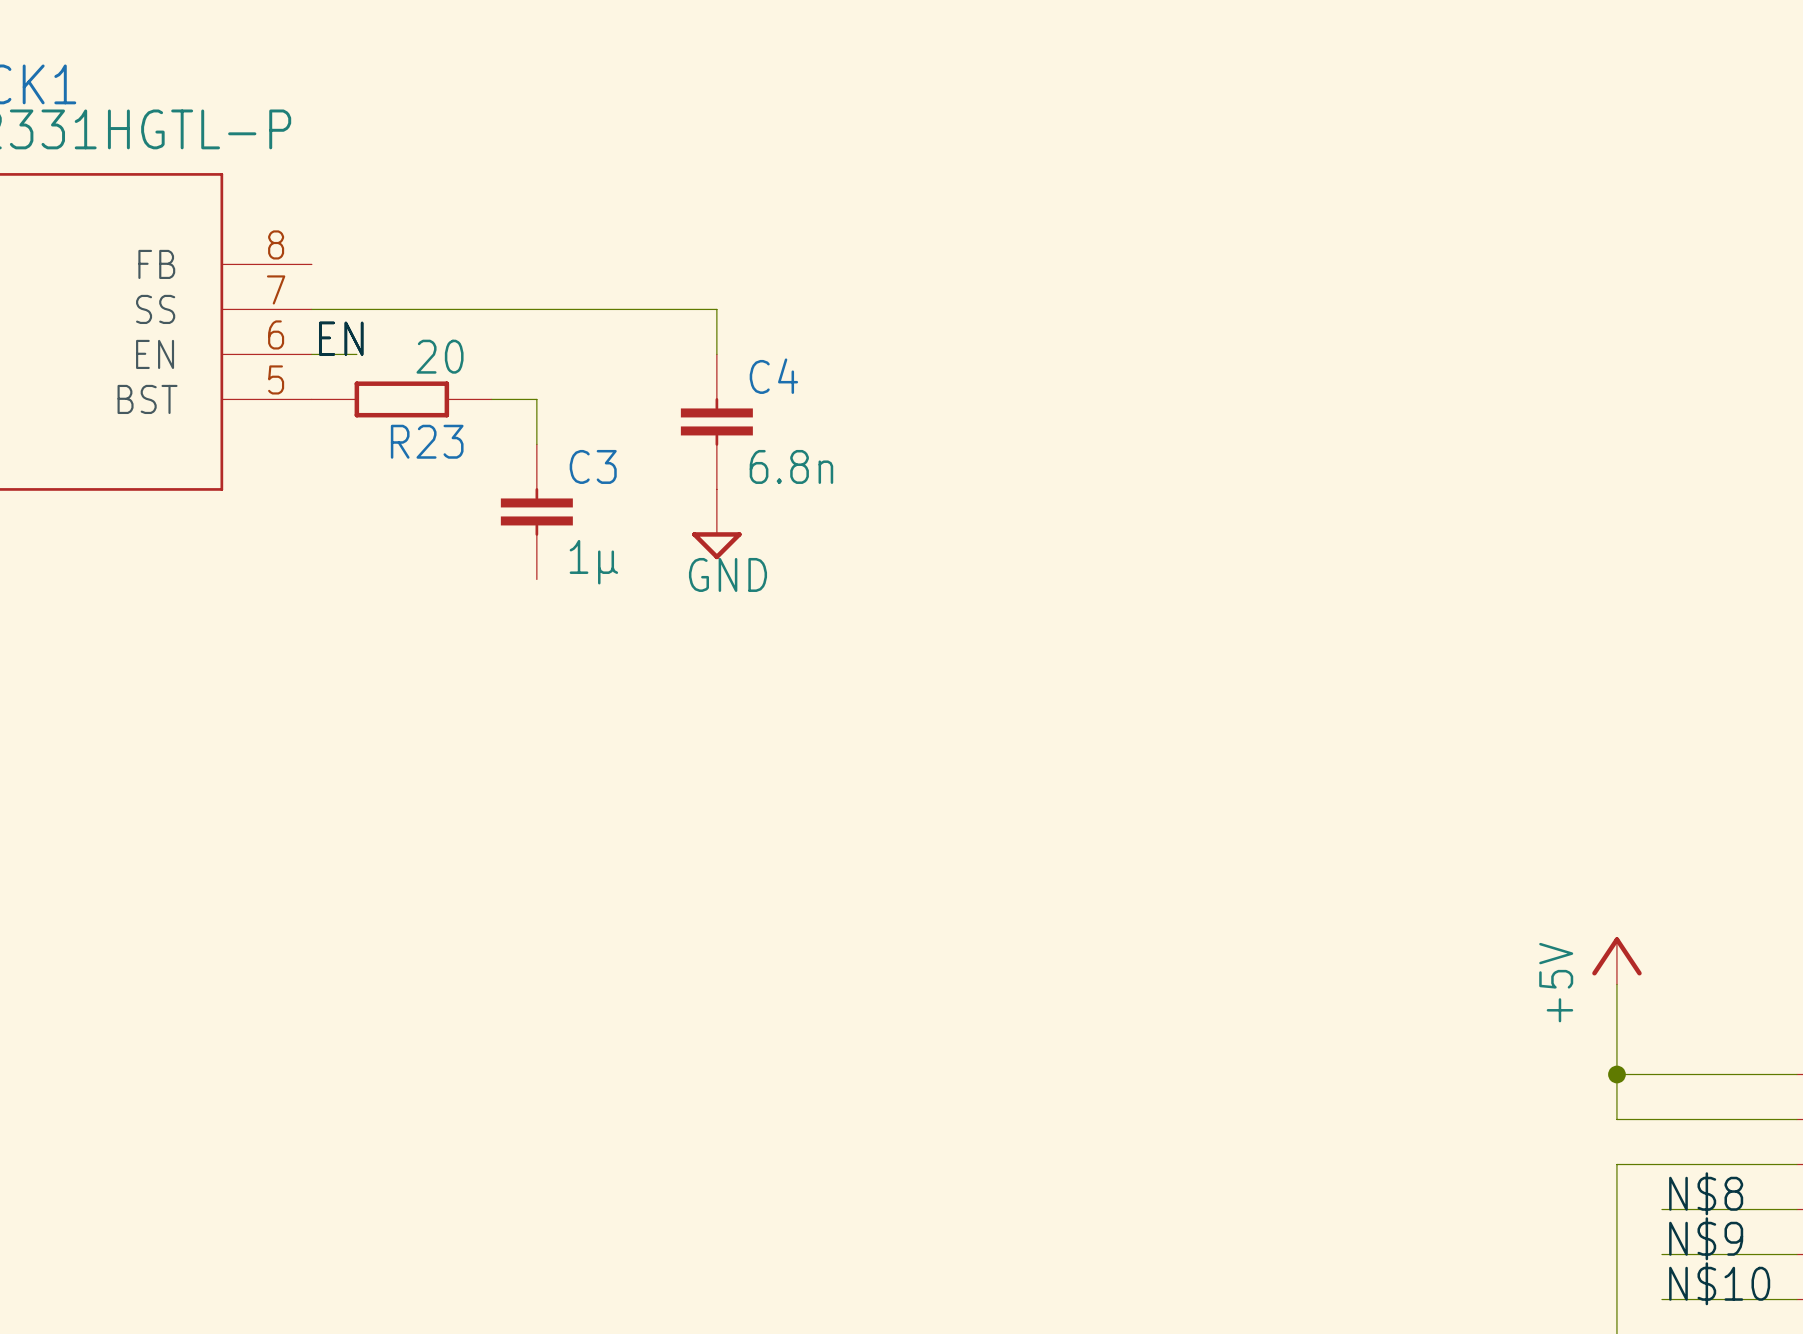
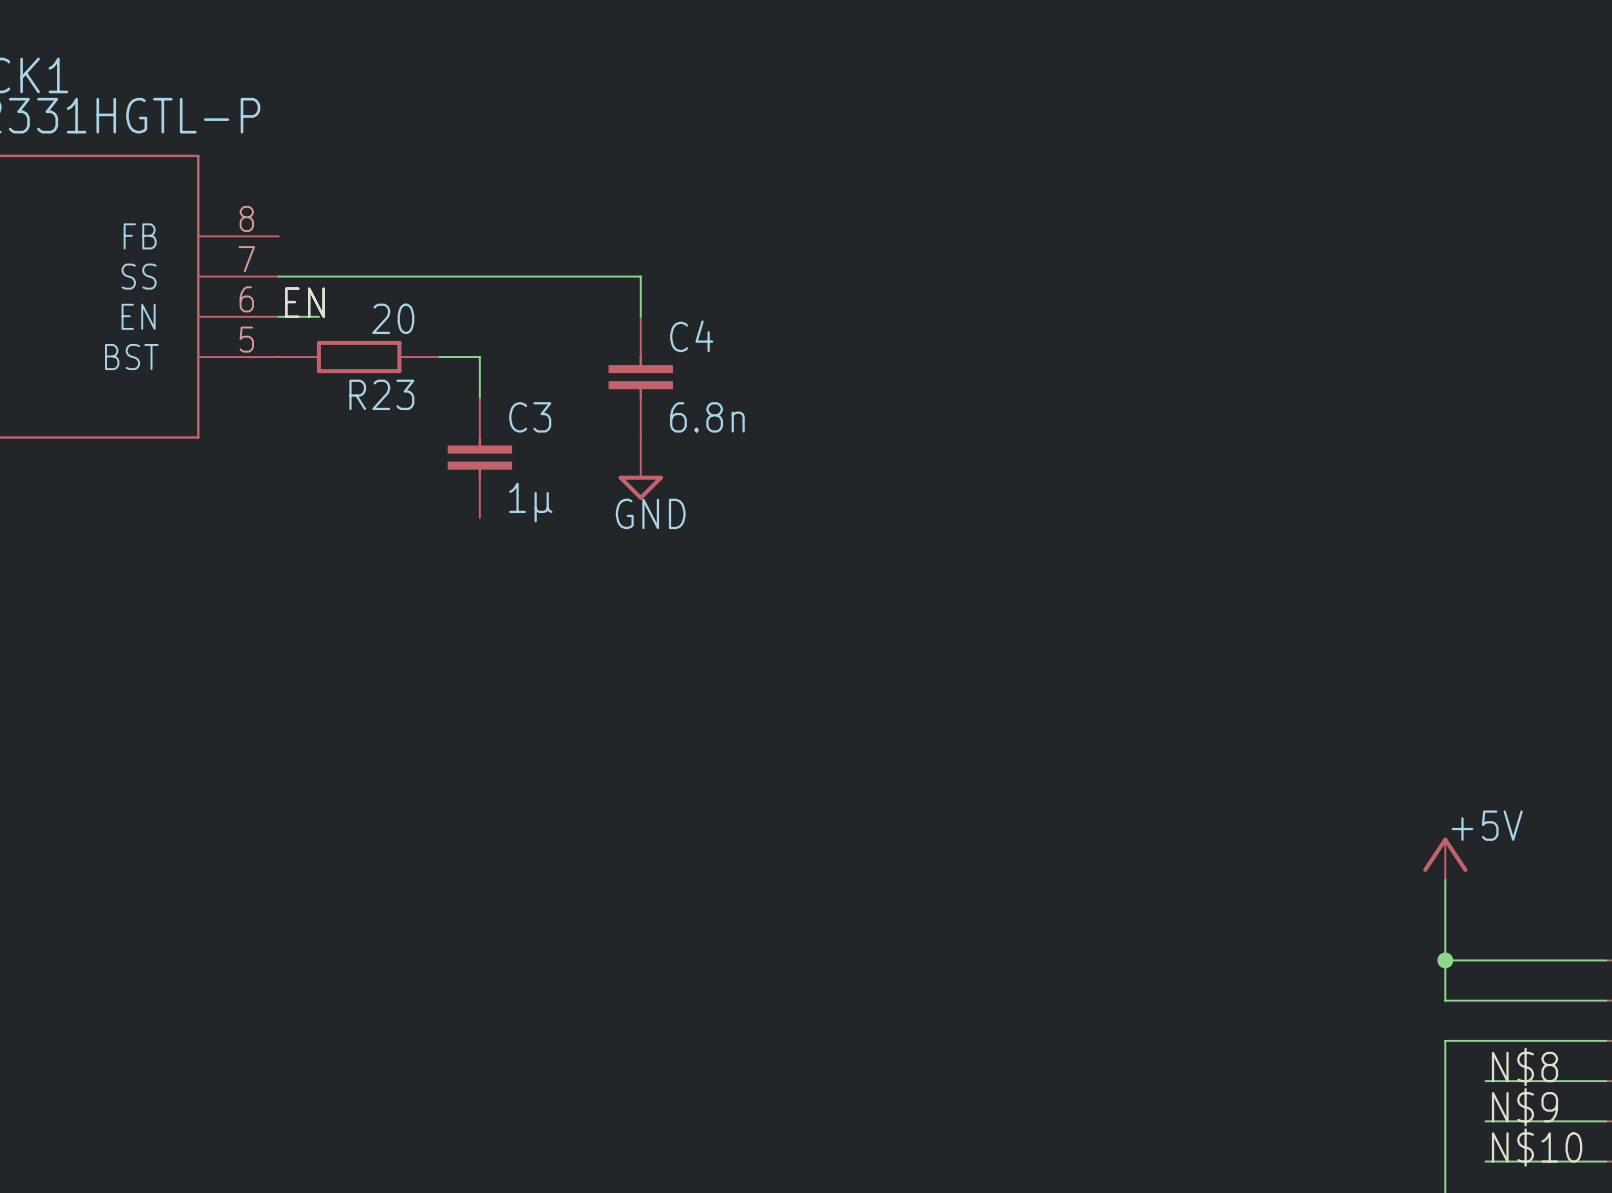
power symbol text rotation: 0° (1556, 982) -> 90° clockwise (1487, 825)
power symbol text position: +5V (1556, 982) -> +5V (1487, 825)

